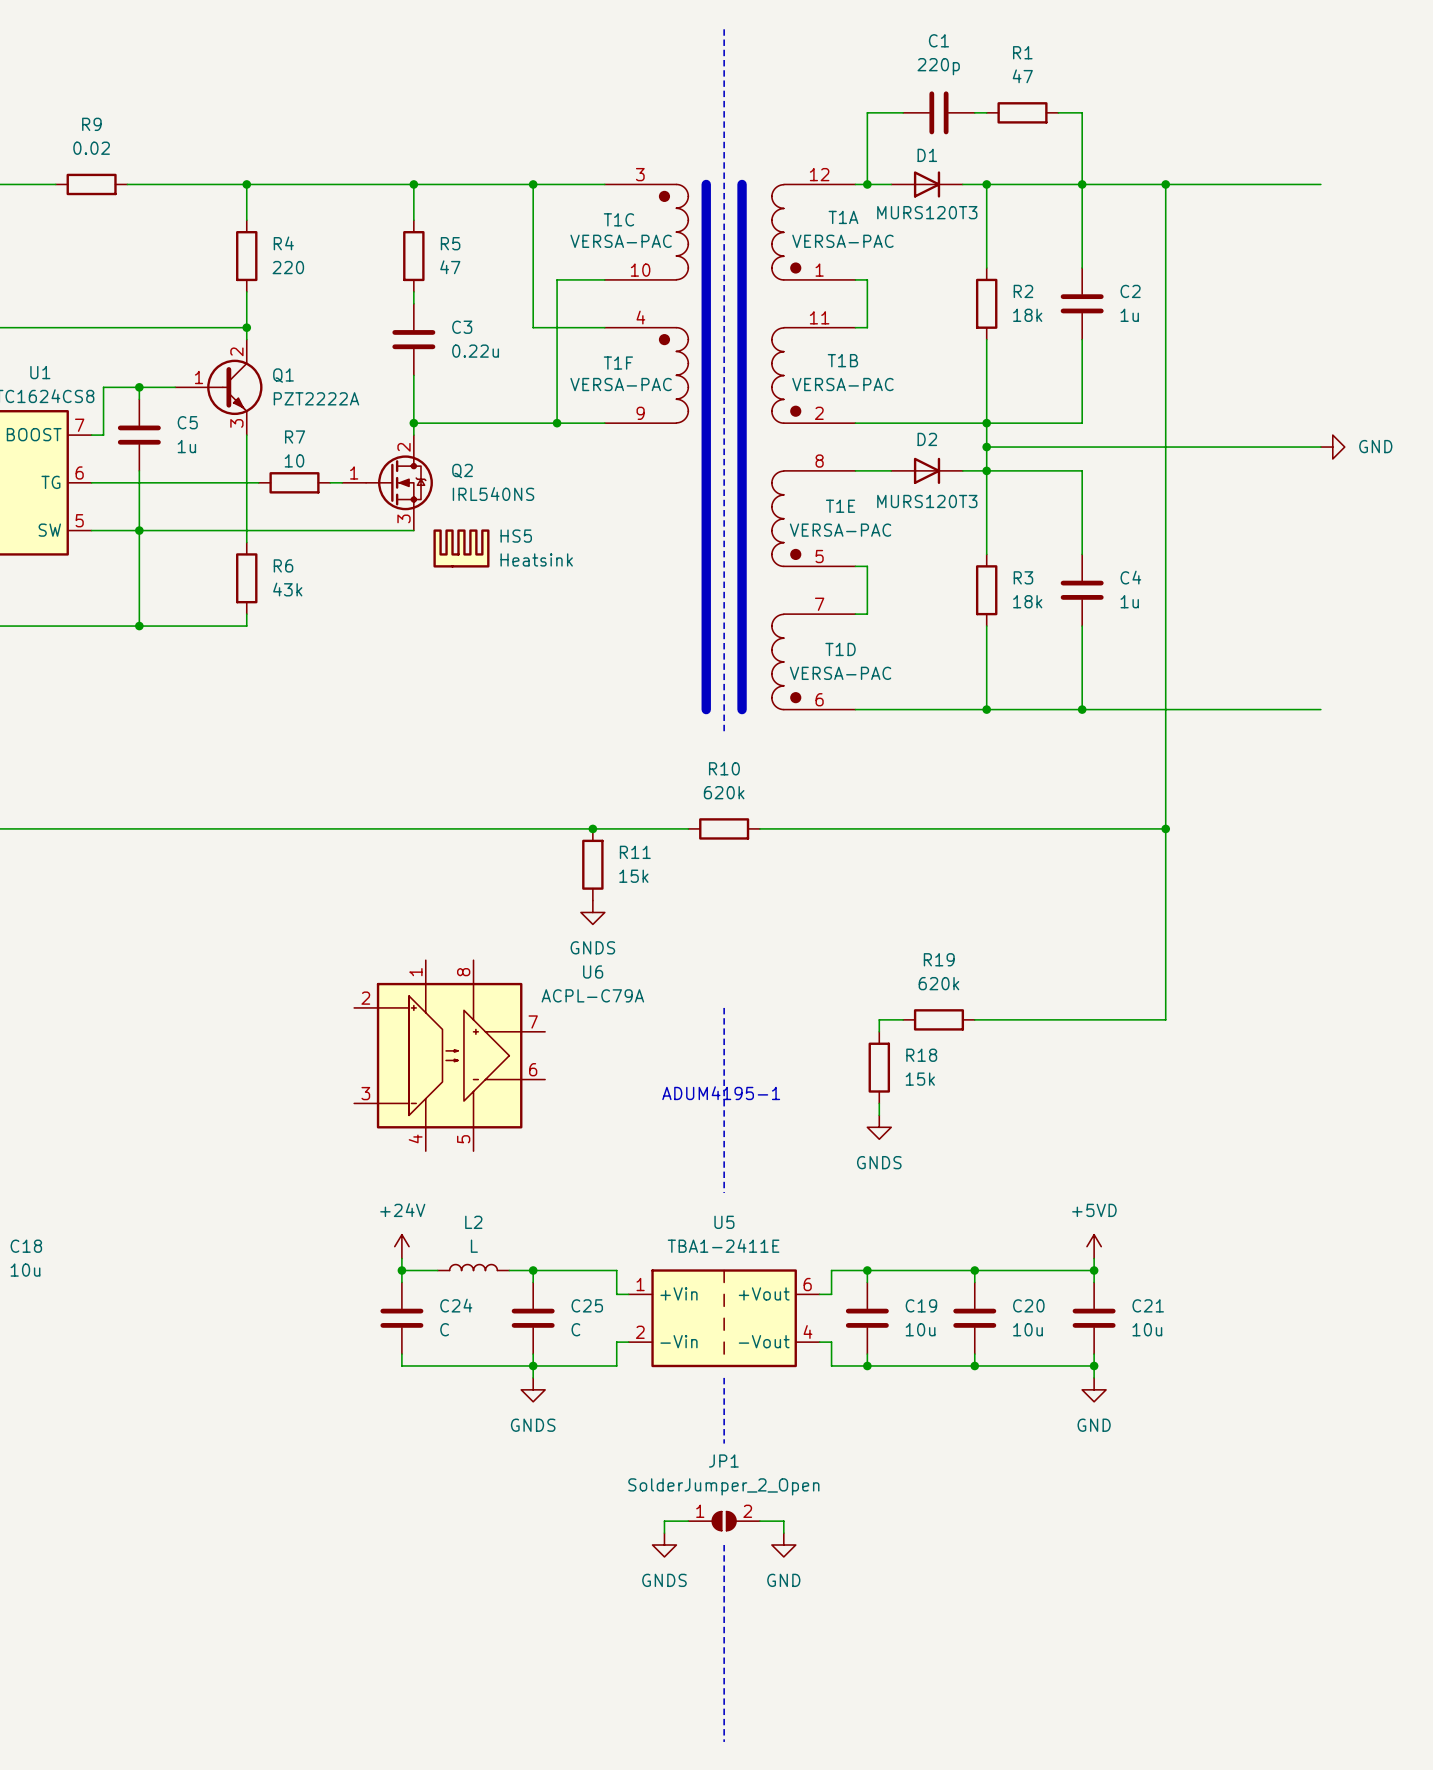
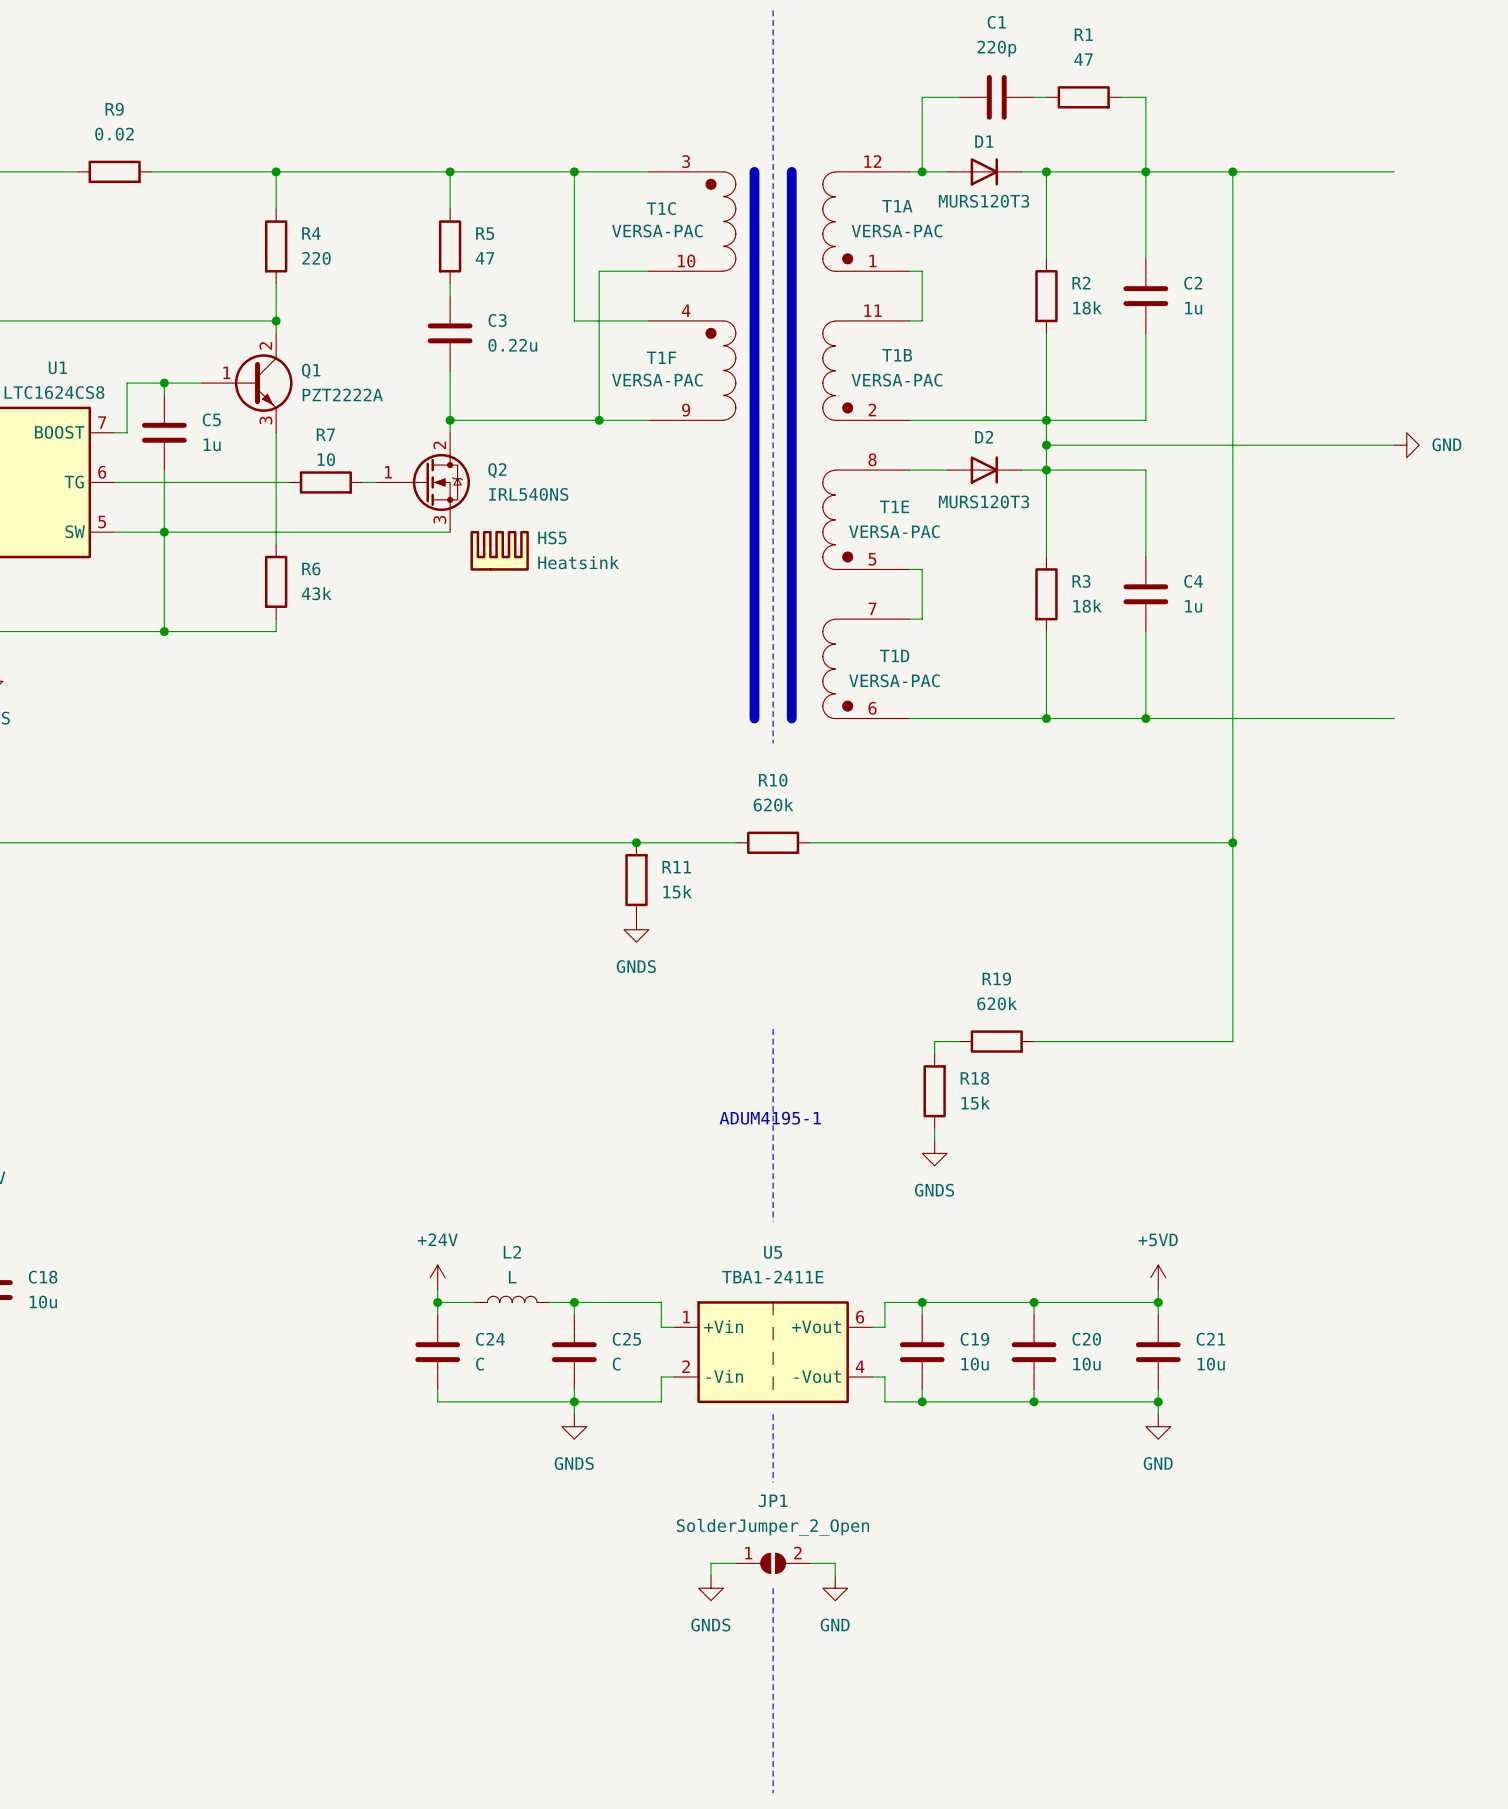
U6: ACPL-C79A (449, 1055) -> none

